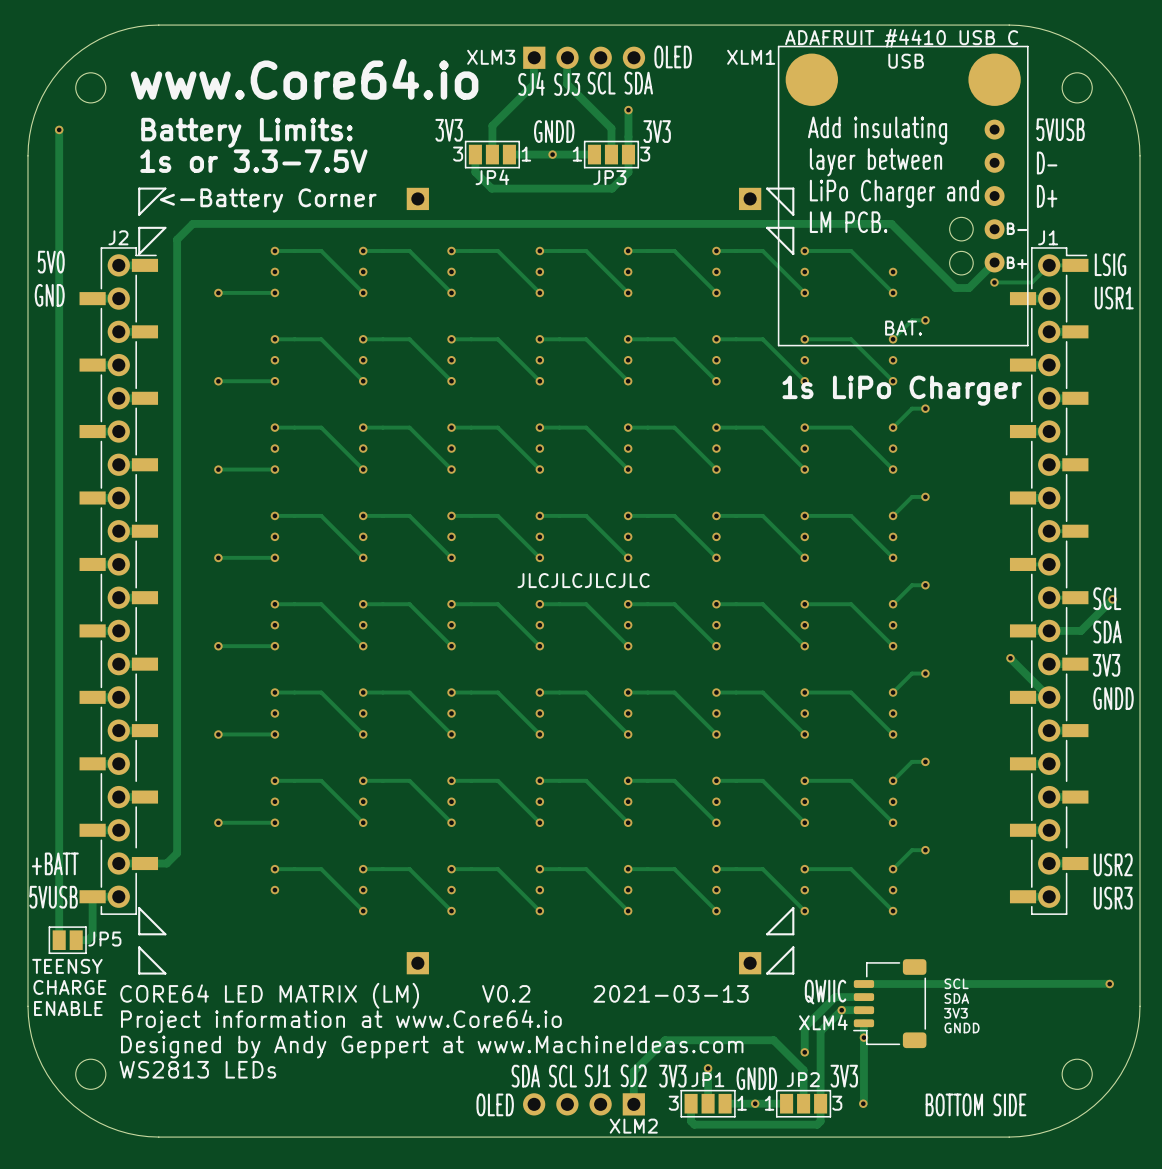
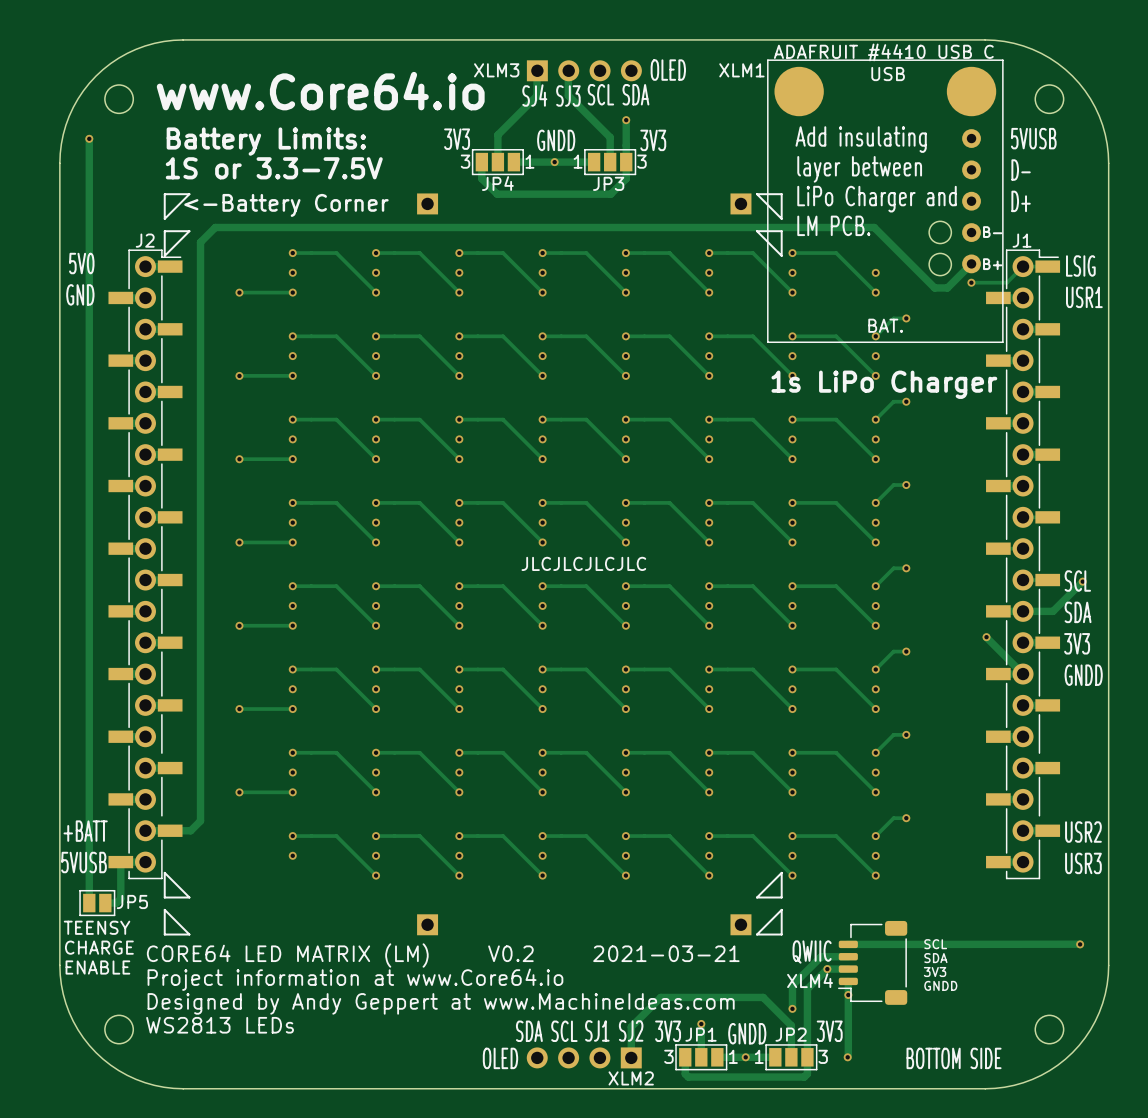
text: 1s or 3.3-7.5V (253, 161) -> 1S or 3.3-7.5V (274, 168)
text: CORE64 LED MATRIX (LM) V0.2 2021-03-13 (434, 995) -> CORE64 LED MATRIX (LM) V0.2 2021-03-21 (443, 955)

